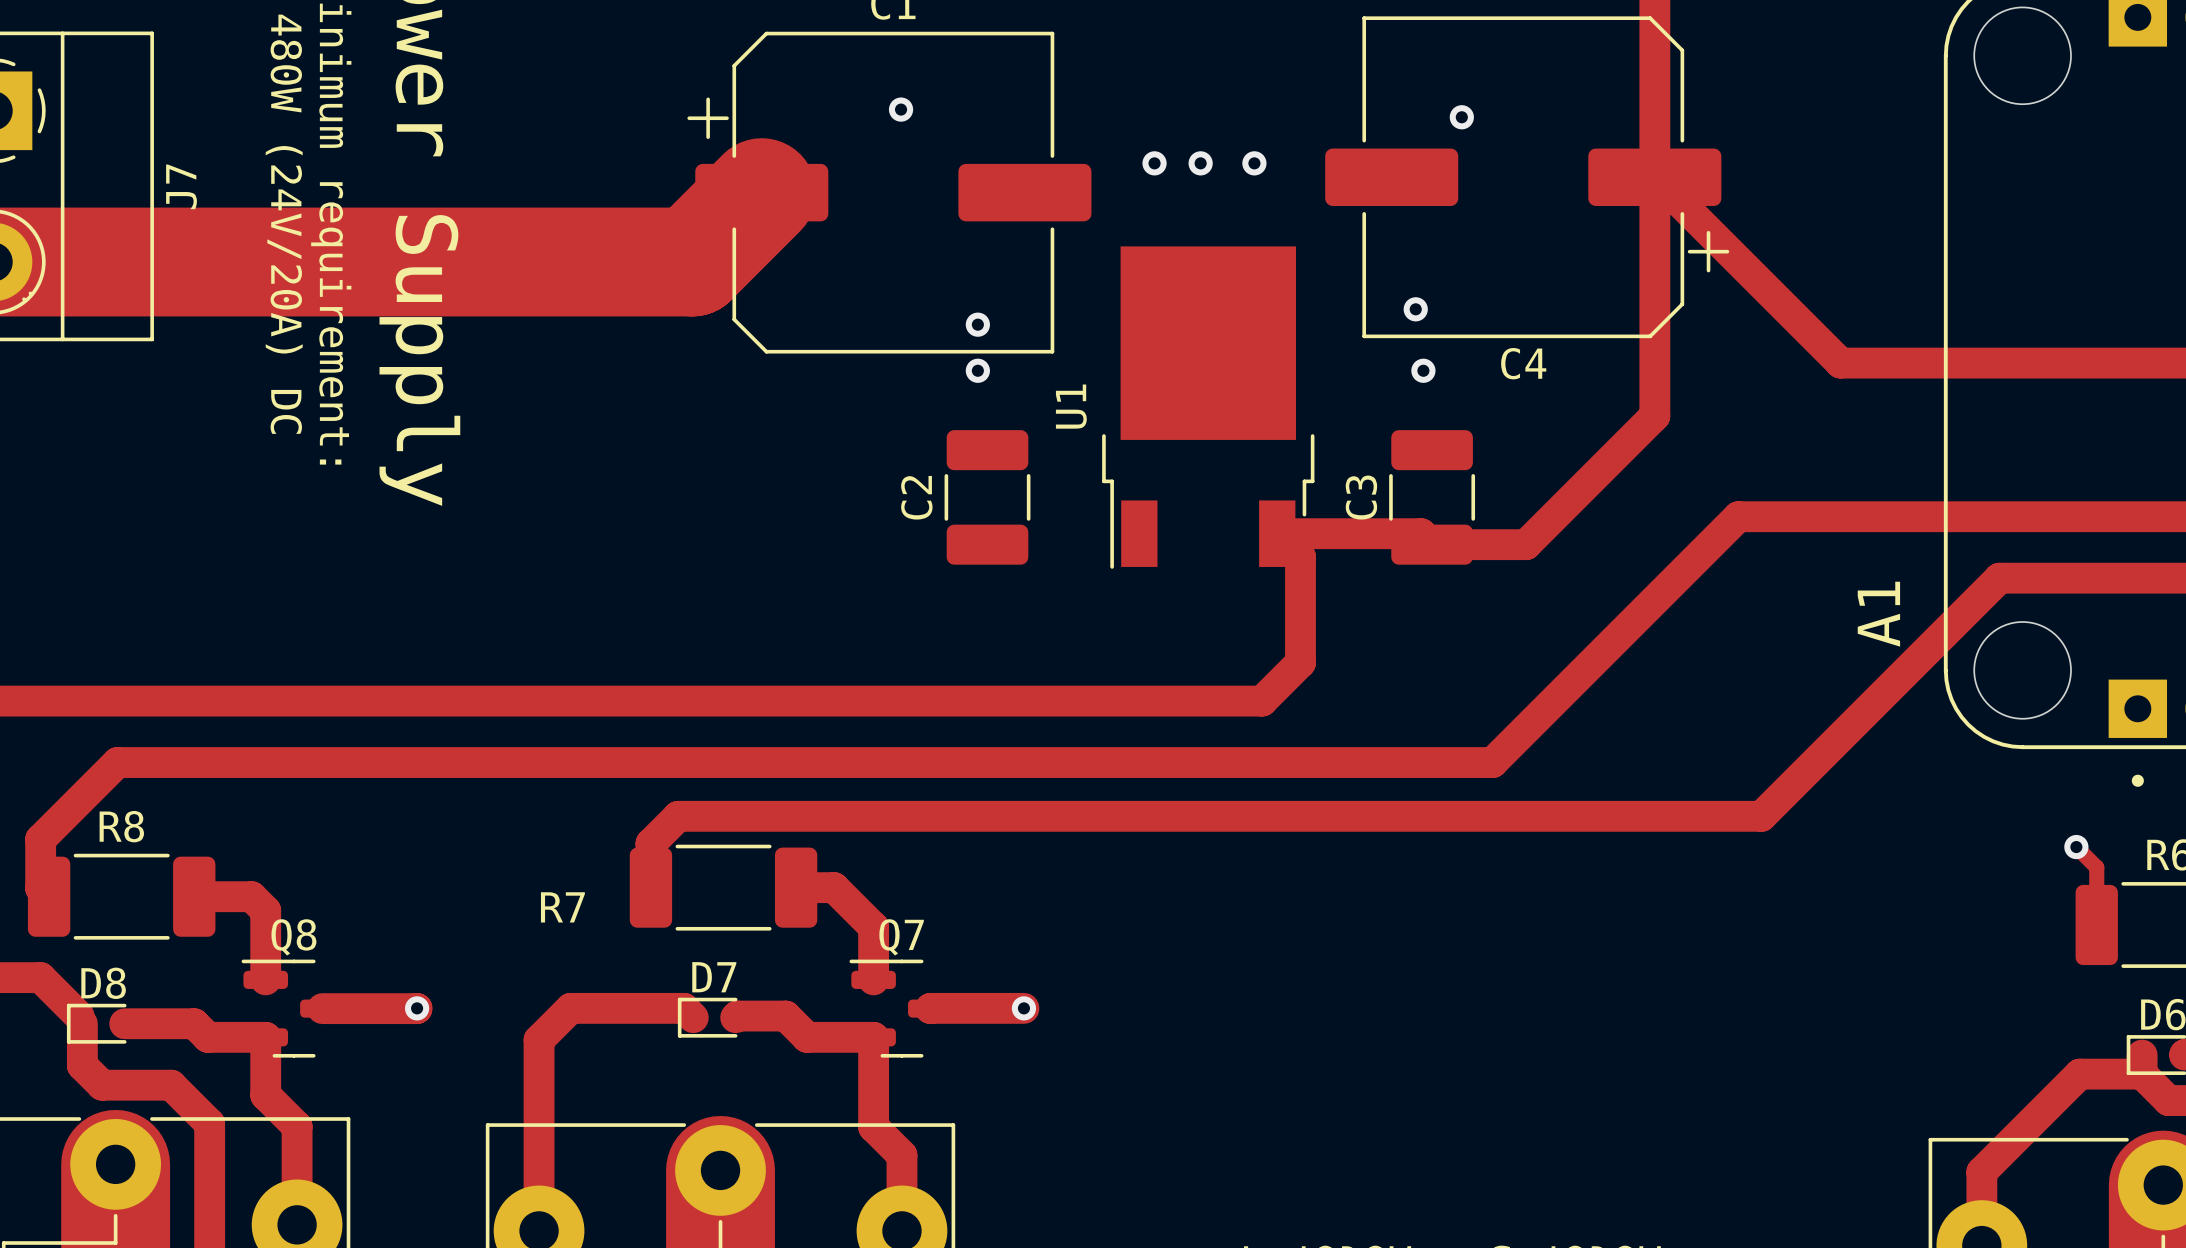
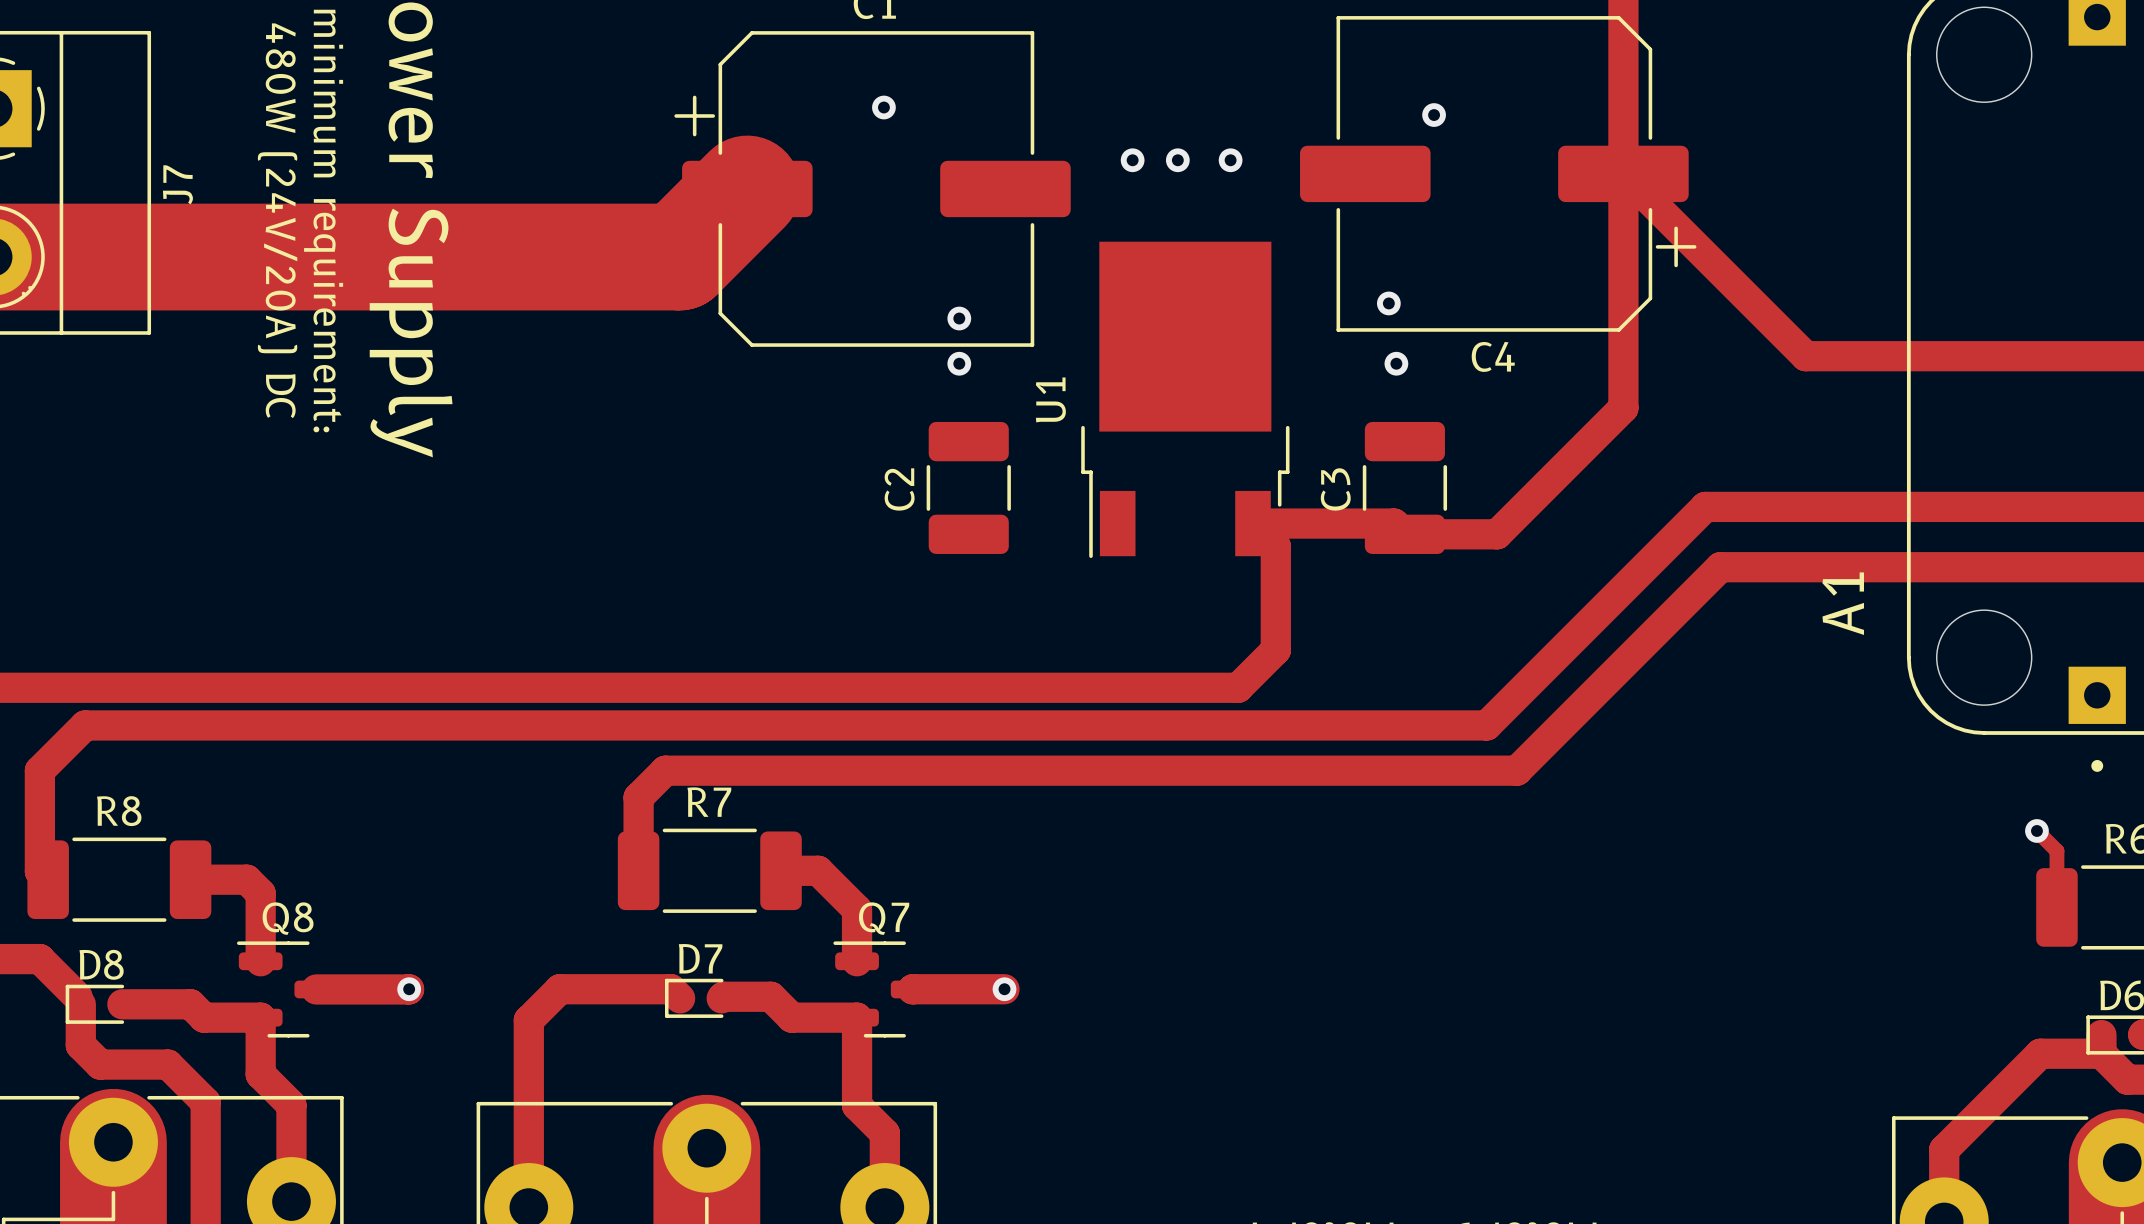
track: (1999, 578) (1761, 816) (678, 816) (650, 843) -> (1961, 567) (1720, 567) (1516, 770) (665, 770) (638, 797) (638, 827)
track: (1515, 739) (1492, 762) (117, 762) (40, 839) -> (1486, 725) (85, 725) (39, 770) (39, 823)
R7 name position: R7 (562, 907) -> R7 (709, 802)

